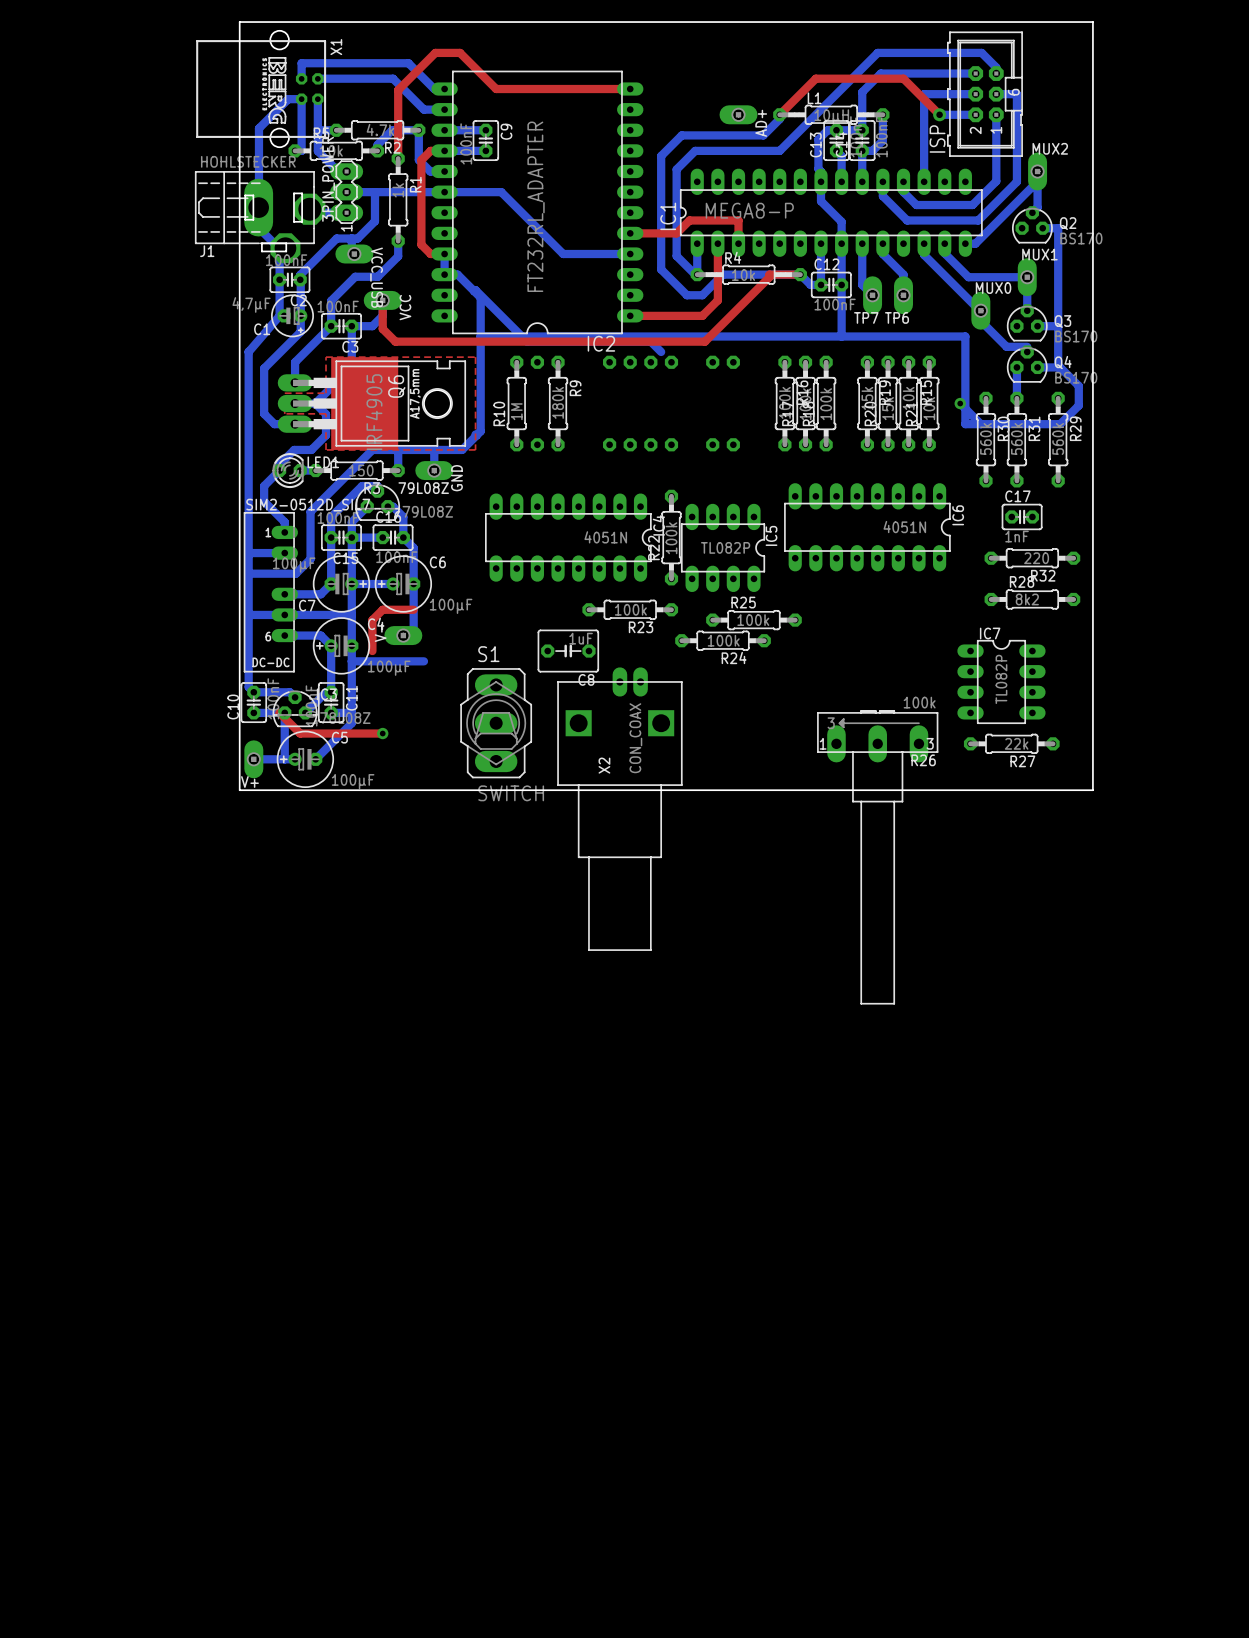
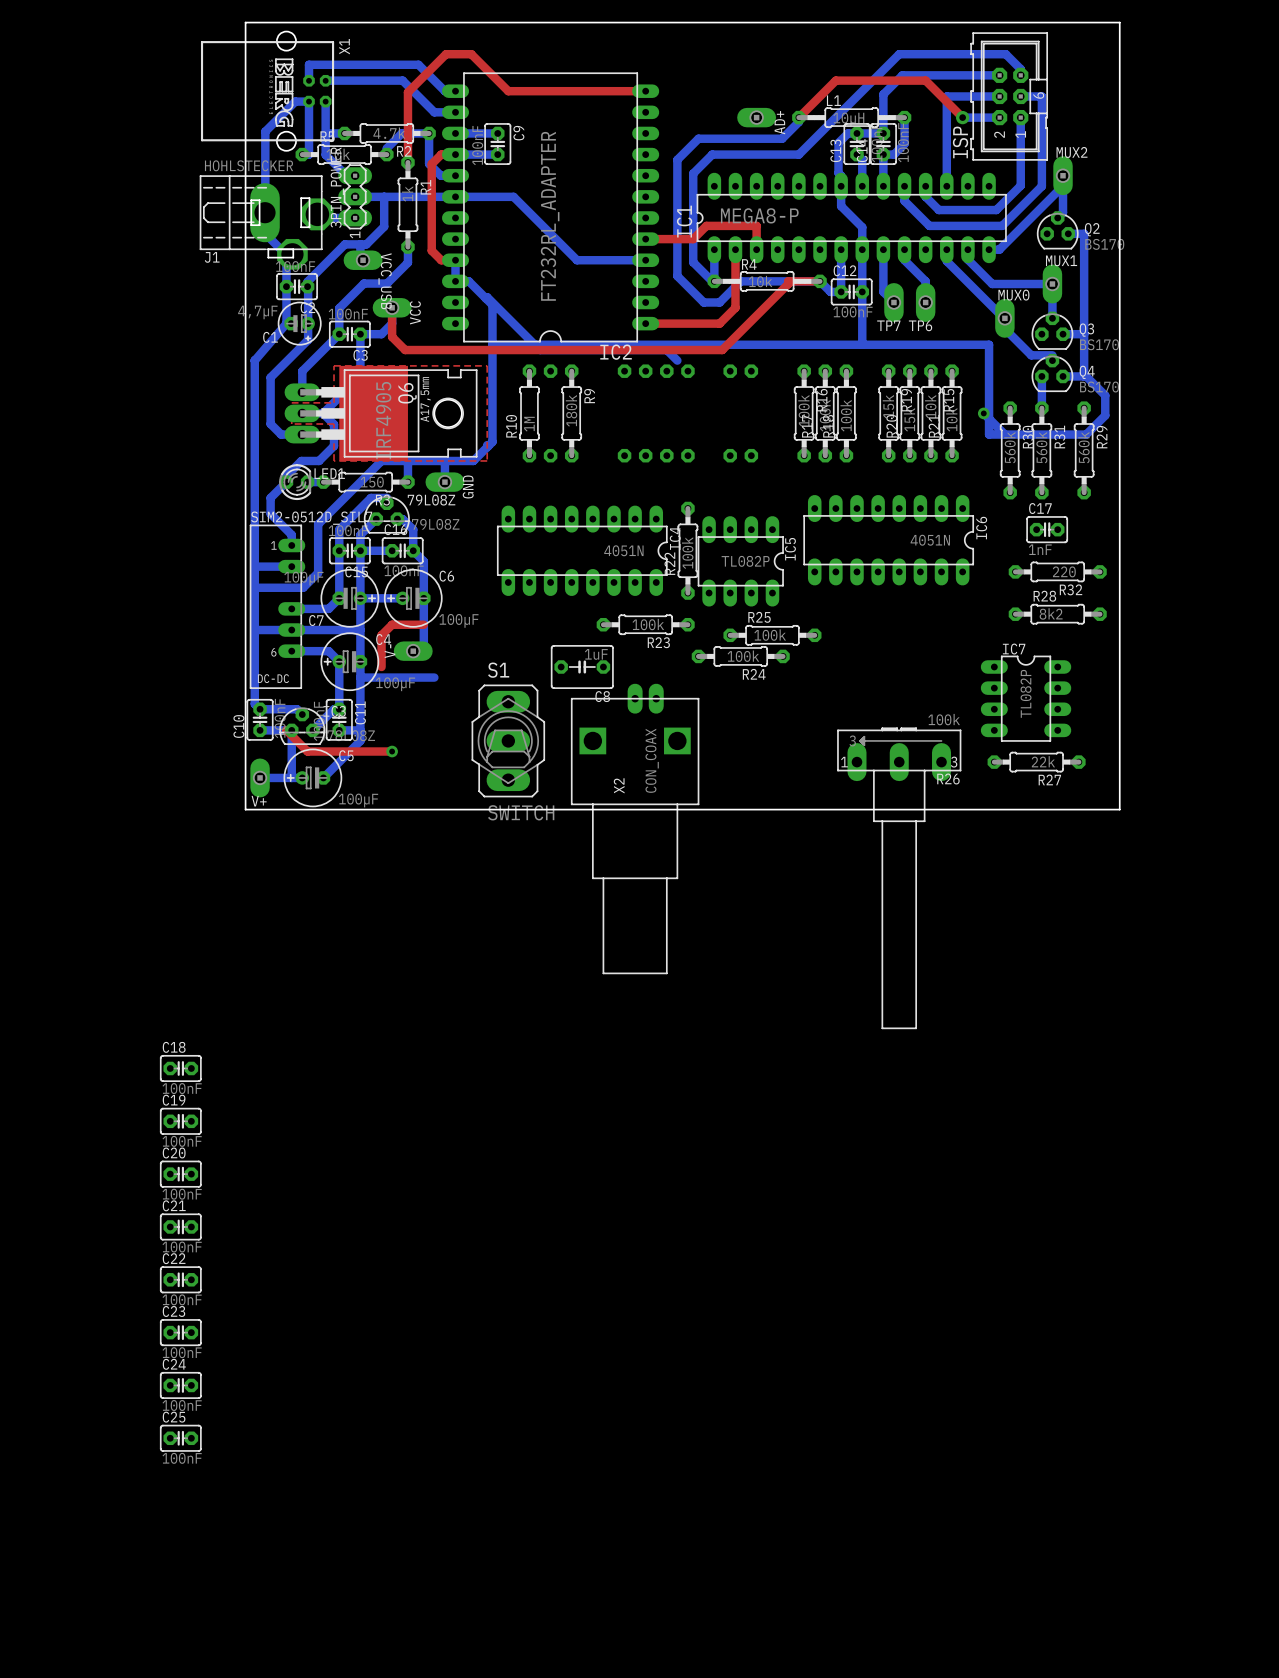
C18: none -> 100nF (180, 1068)
C19: none -> 100nF (180, 1121)
C20: none -> 100nF (180, 1174)
C21: none -> 100nF (180, 1226)
C22: none -> 100nF (180, 1279)
C23: none -> 100nF (180, 1332)
C24: none -> 100nF (180, 1385)
C25: none -> 100nF (180, 1438)

